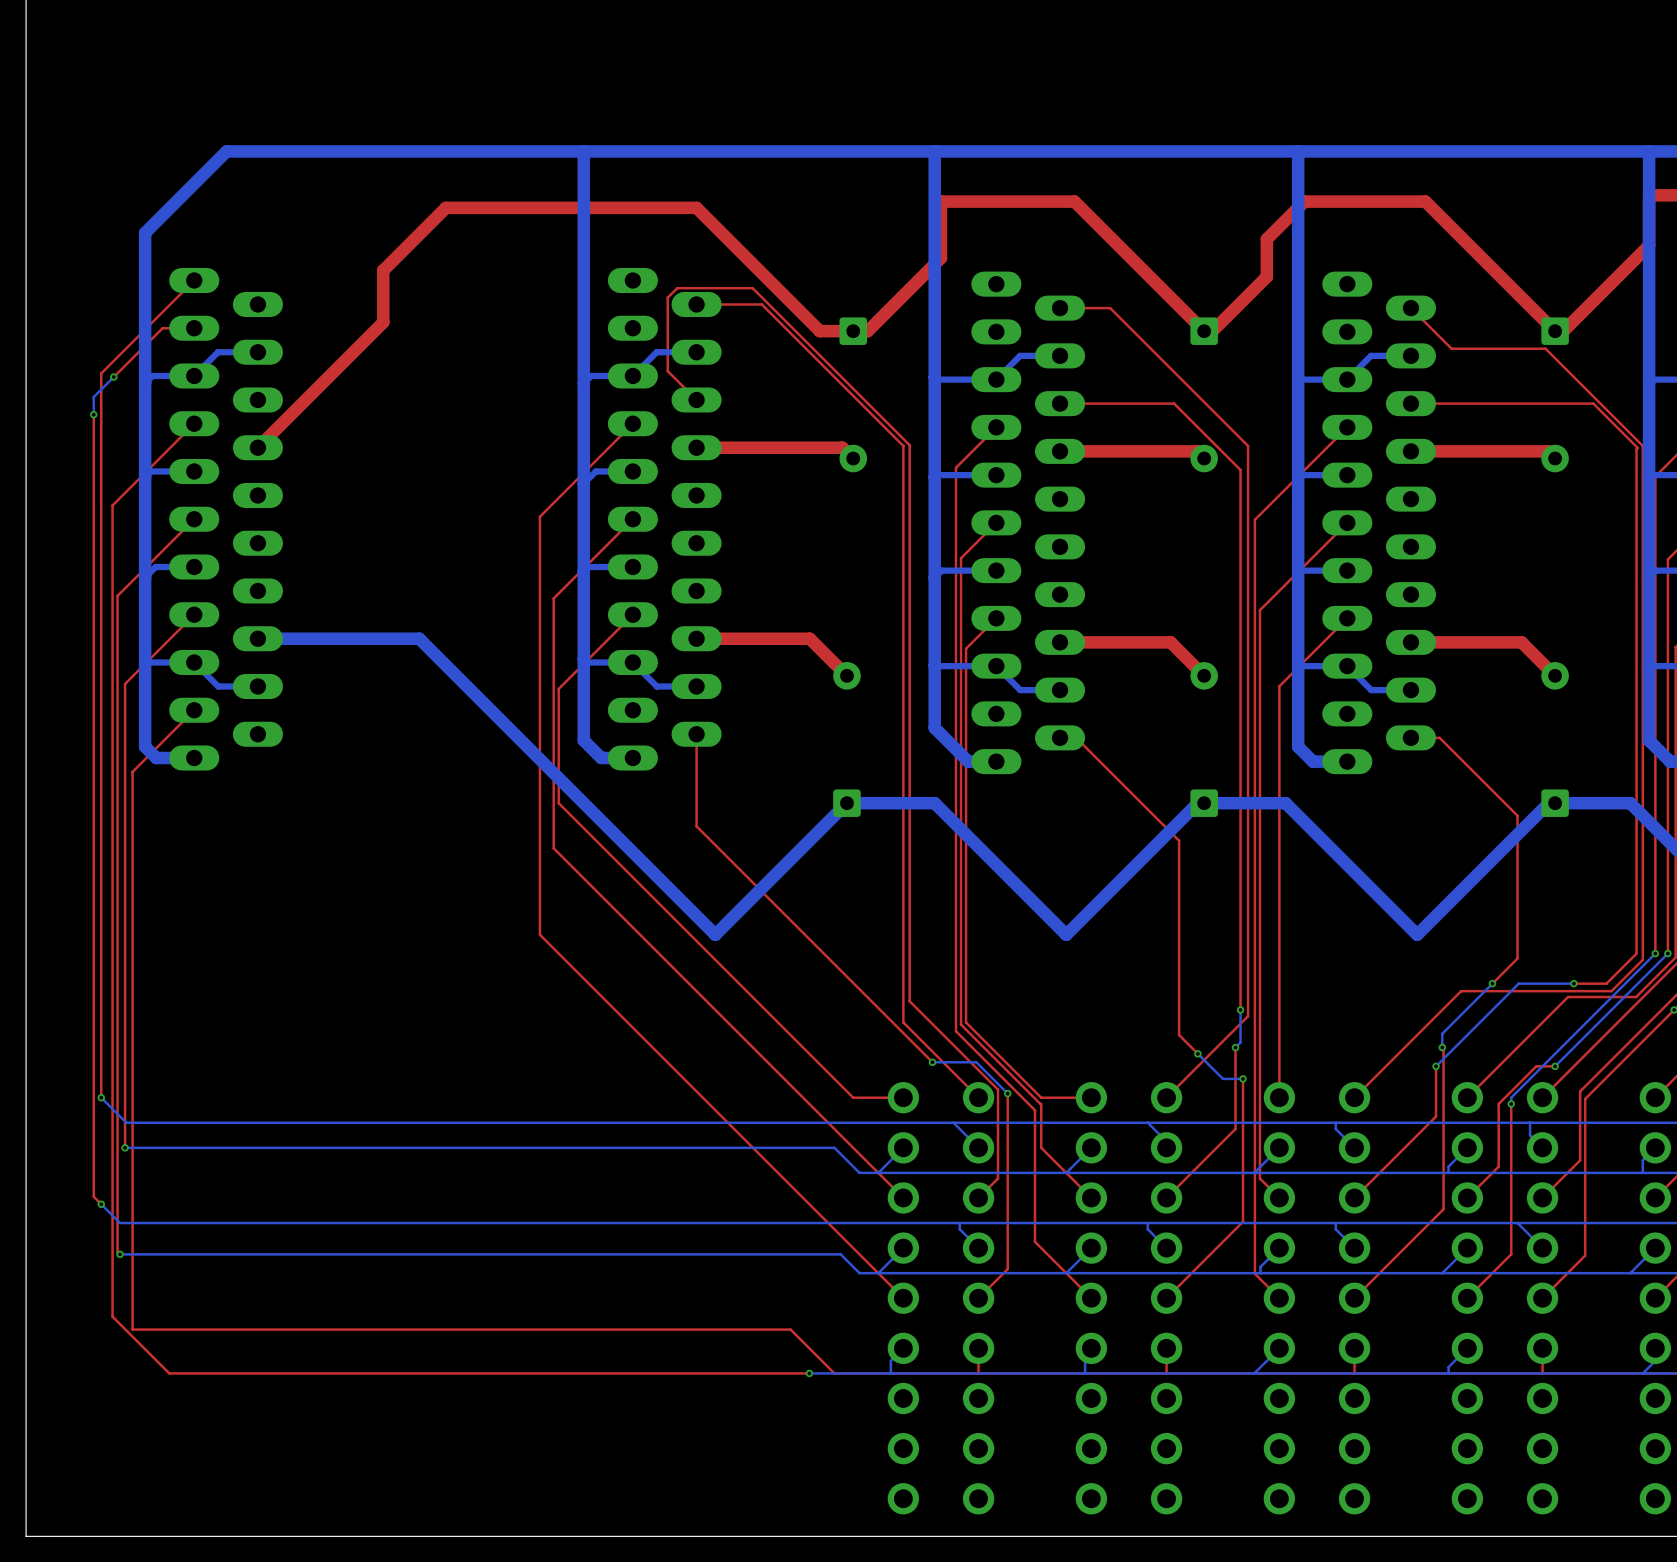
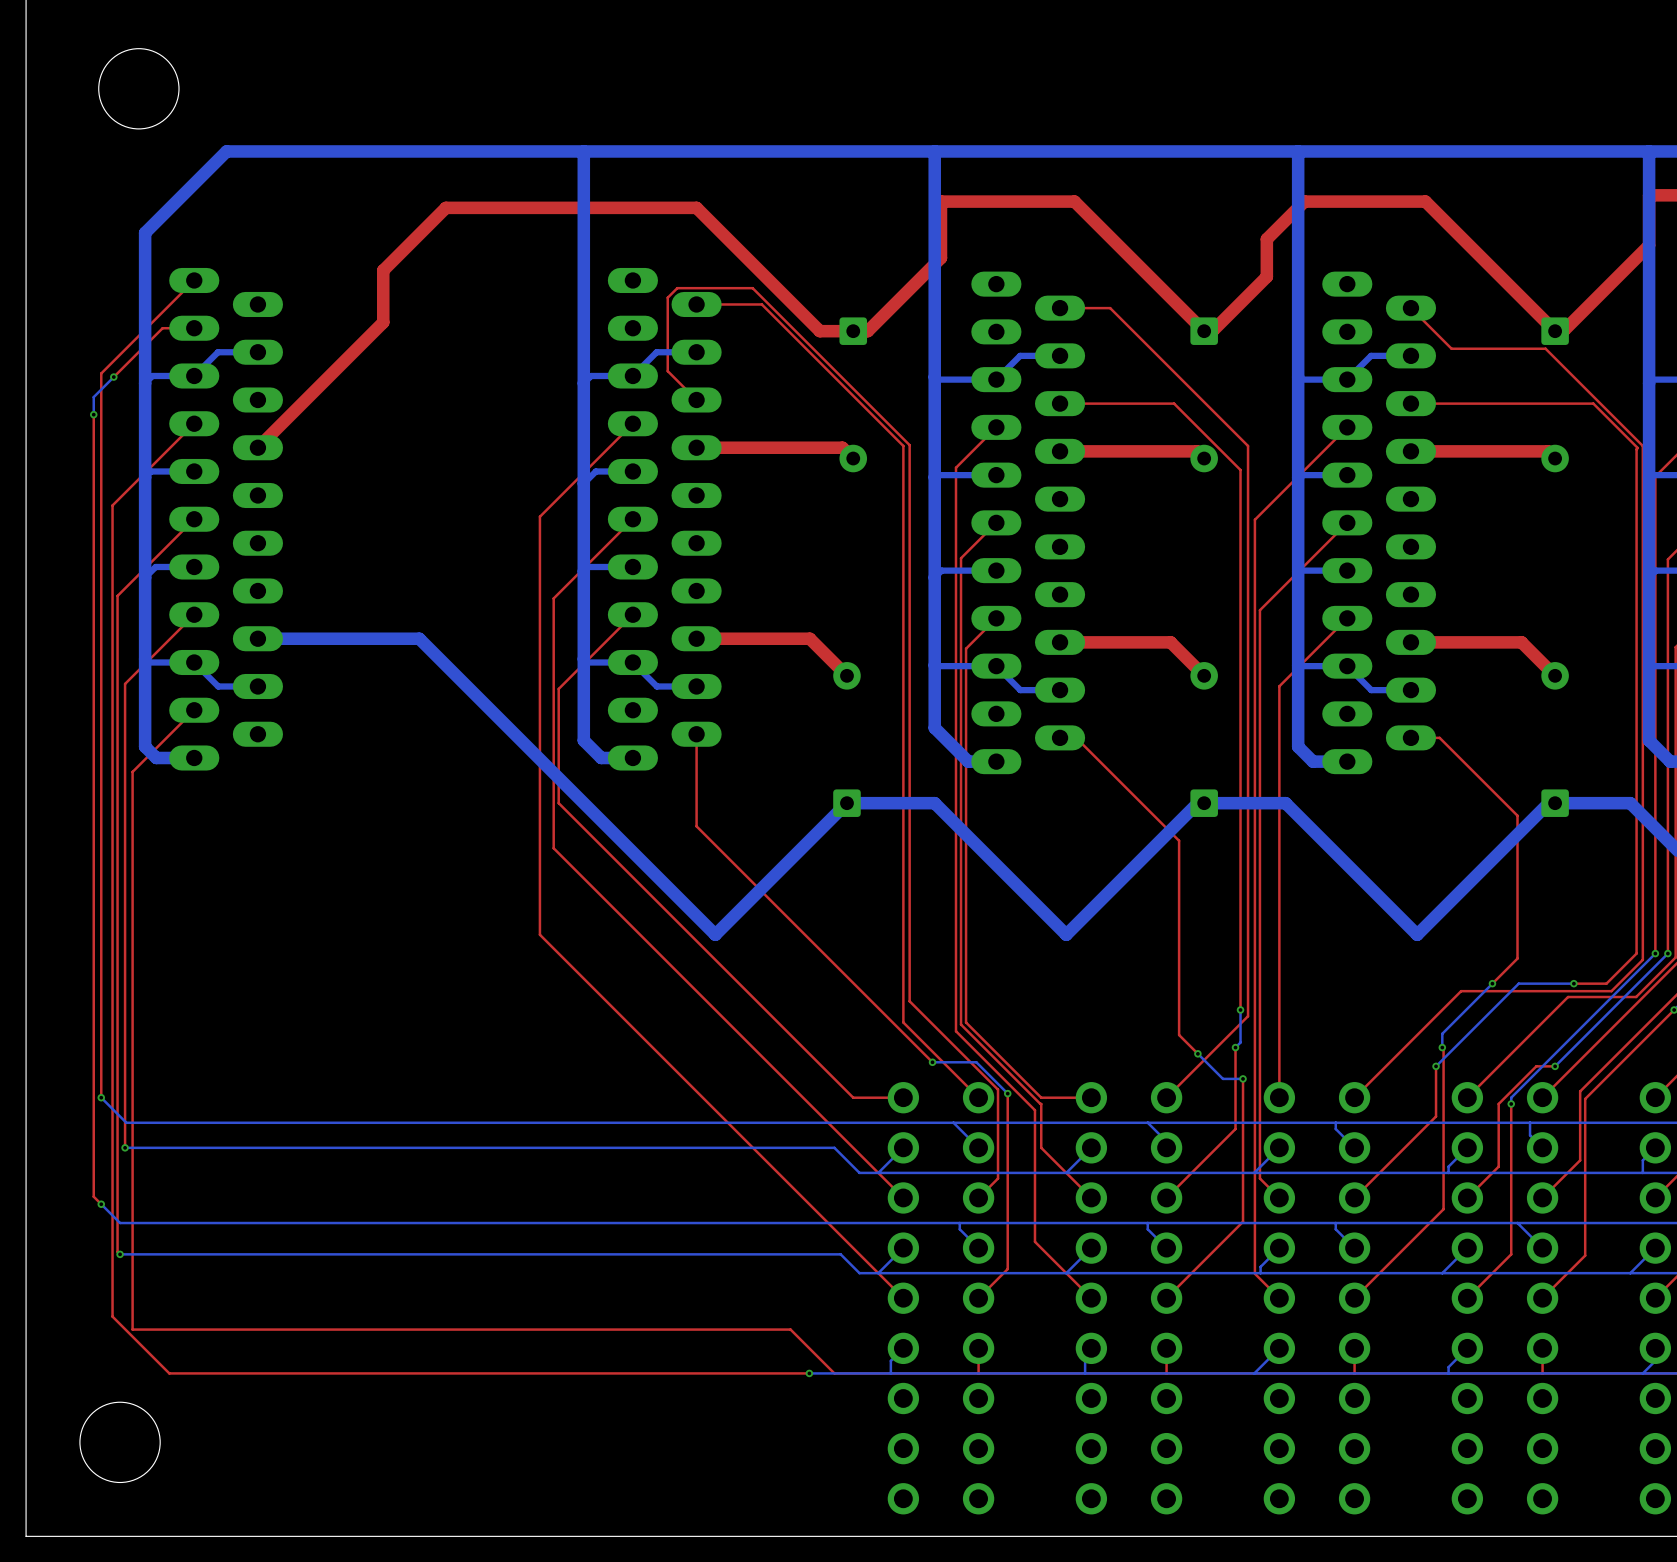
round board edge: none -> [98, 48, 180, 130]
round board edge: none -> [79, 1401, 161, 1483]

